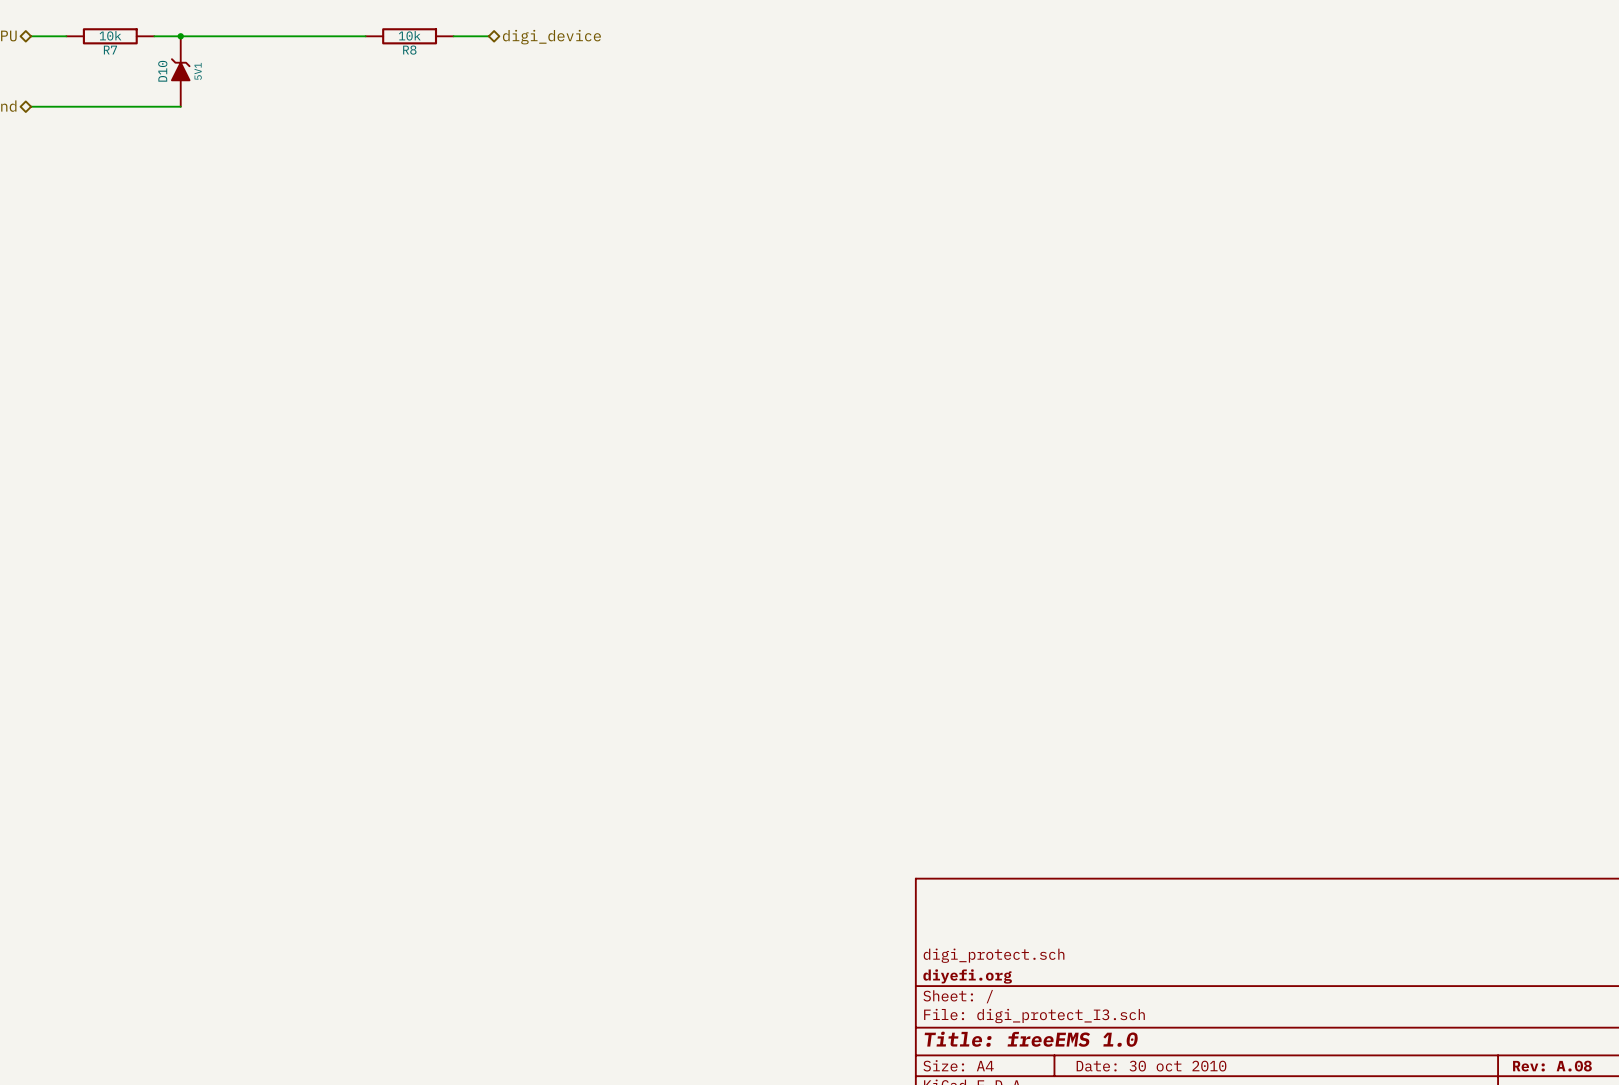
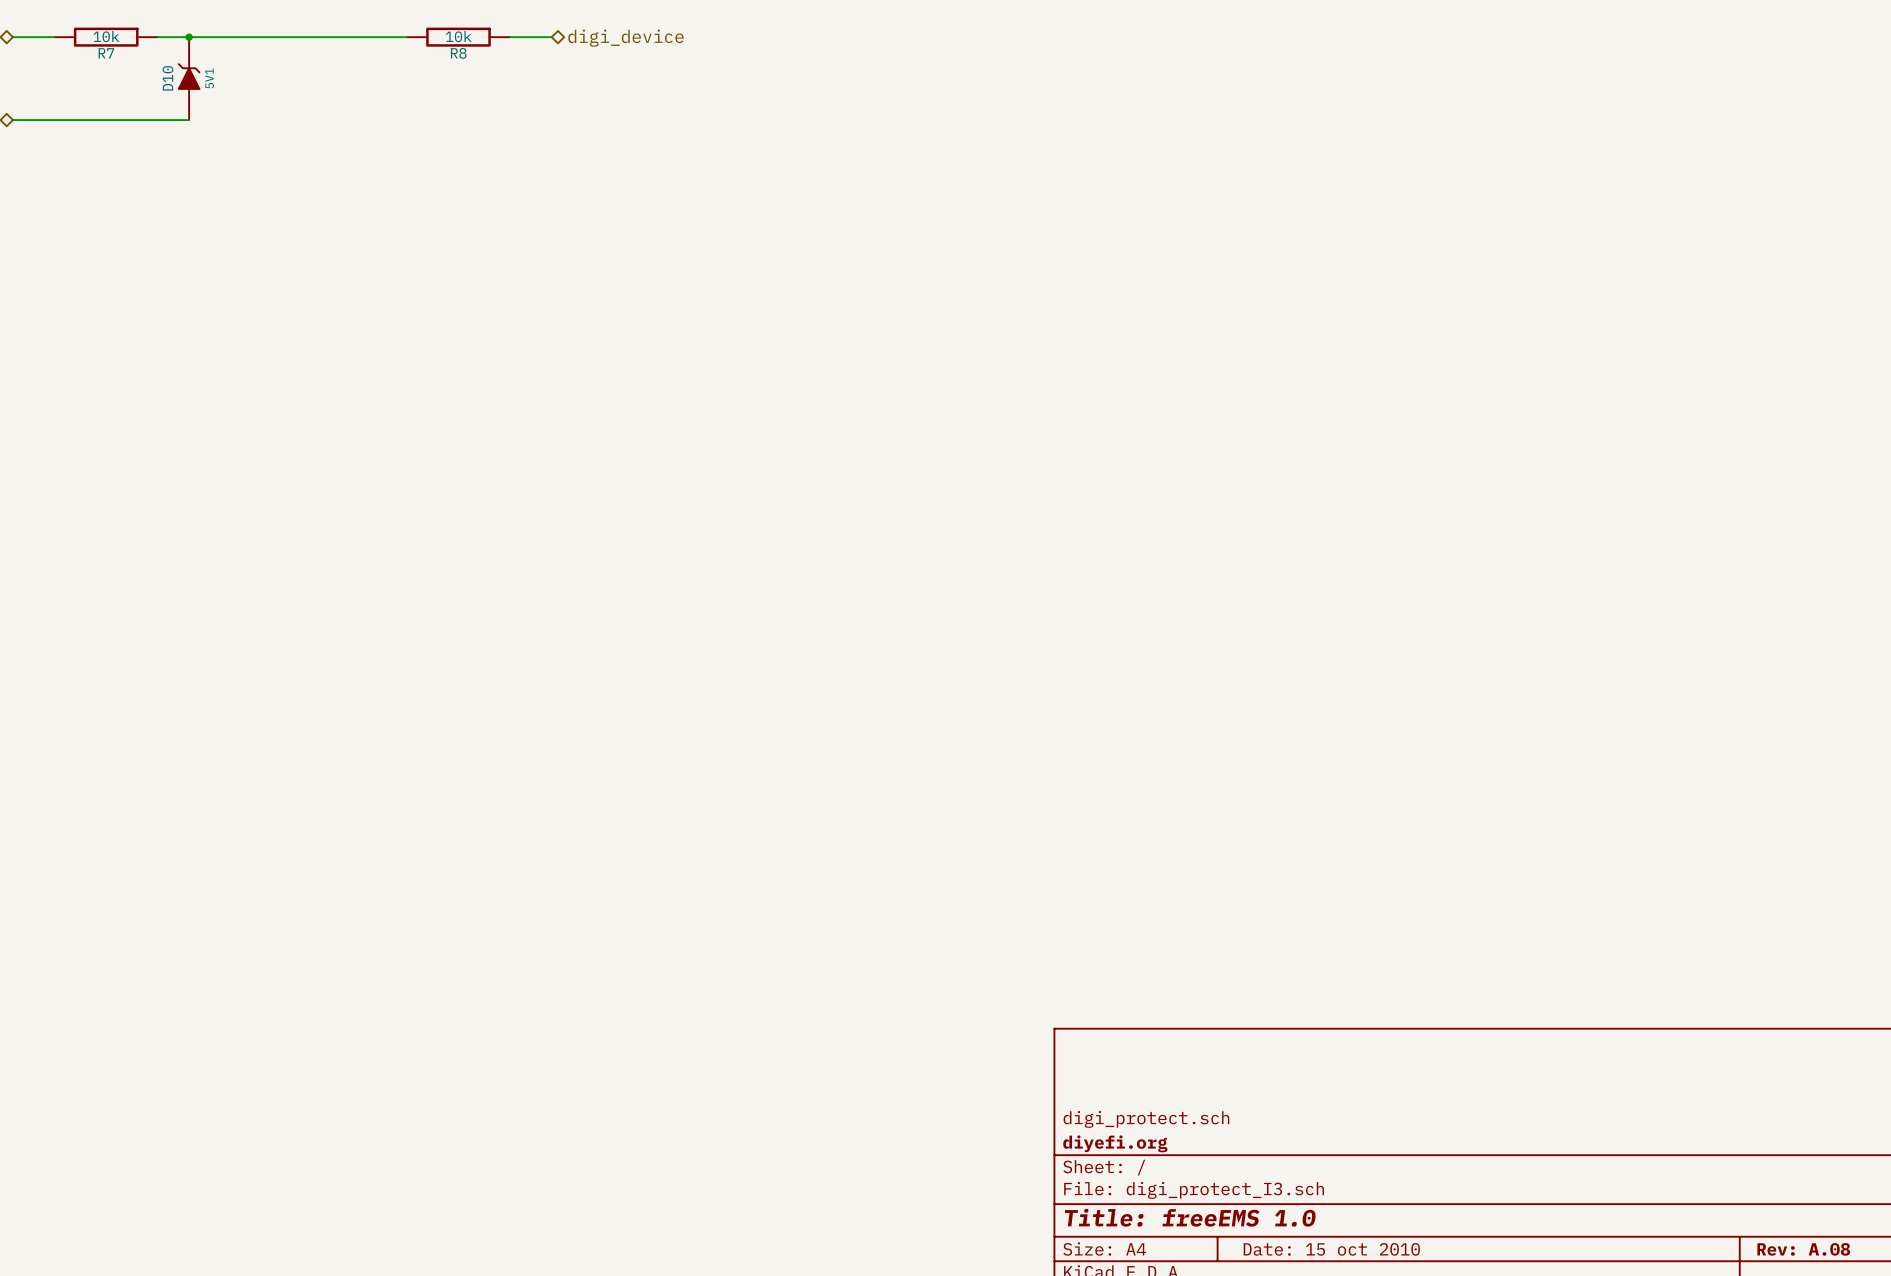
title block: Date: 30 oct 2010 (1151, 1066) -> Date: 15 oct 2010 (1331, 1249)

